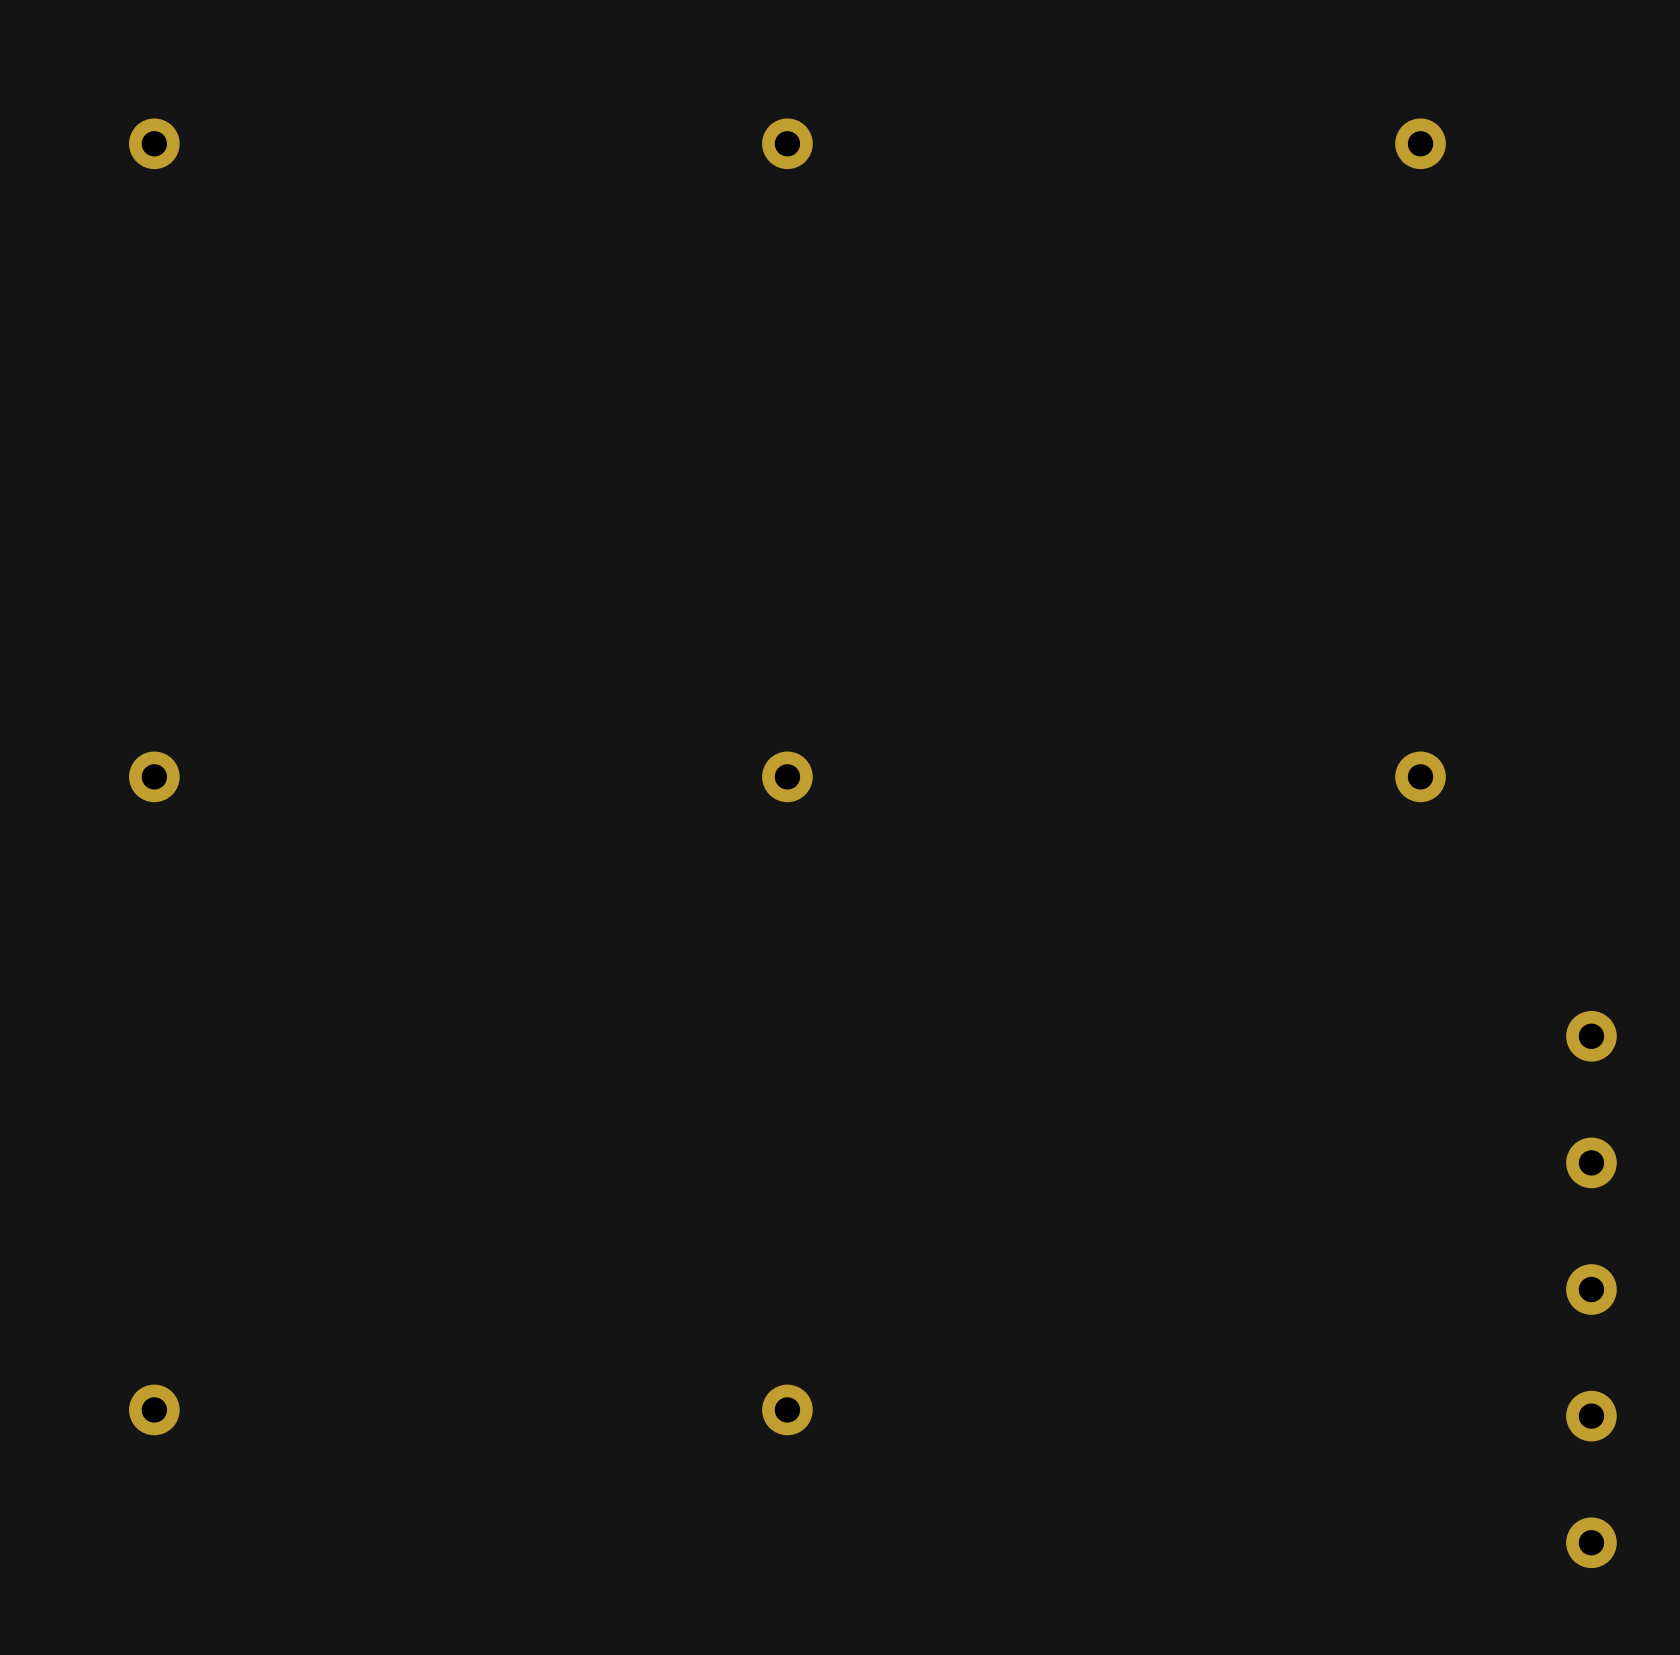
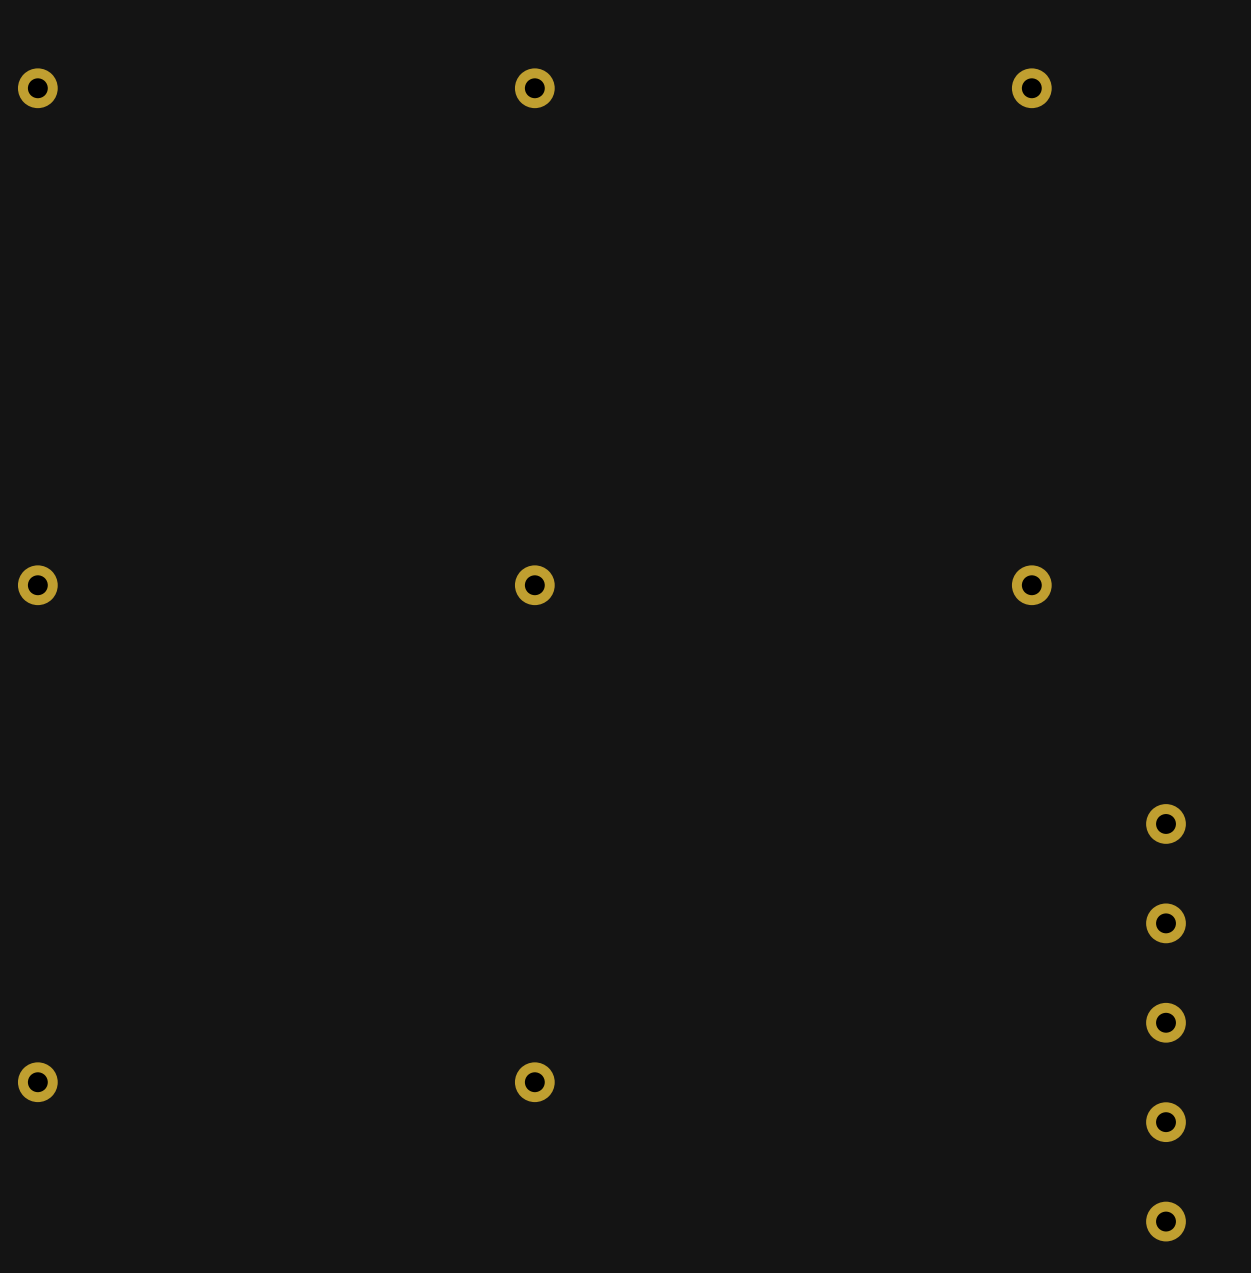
via position: (1591, 1036) -> (1166, 823)
via position: (1591, 1162) -> (1166, 923)
via position: (1591, 1289) -> (1166, 1022)
via position: (1591, 1416) -> (1166, 1122)
via position: (1591, 1542) -> (1166, 1221)

